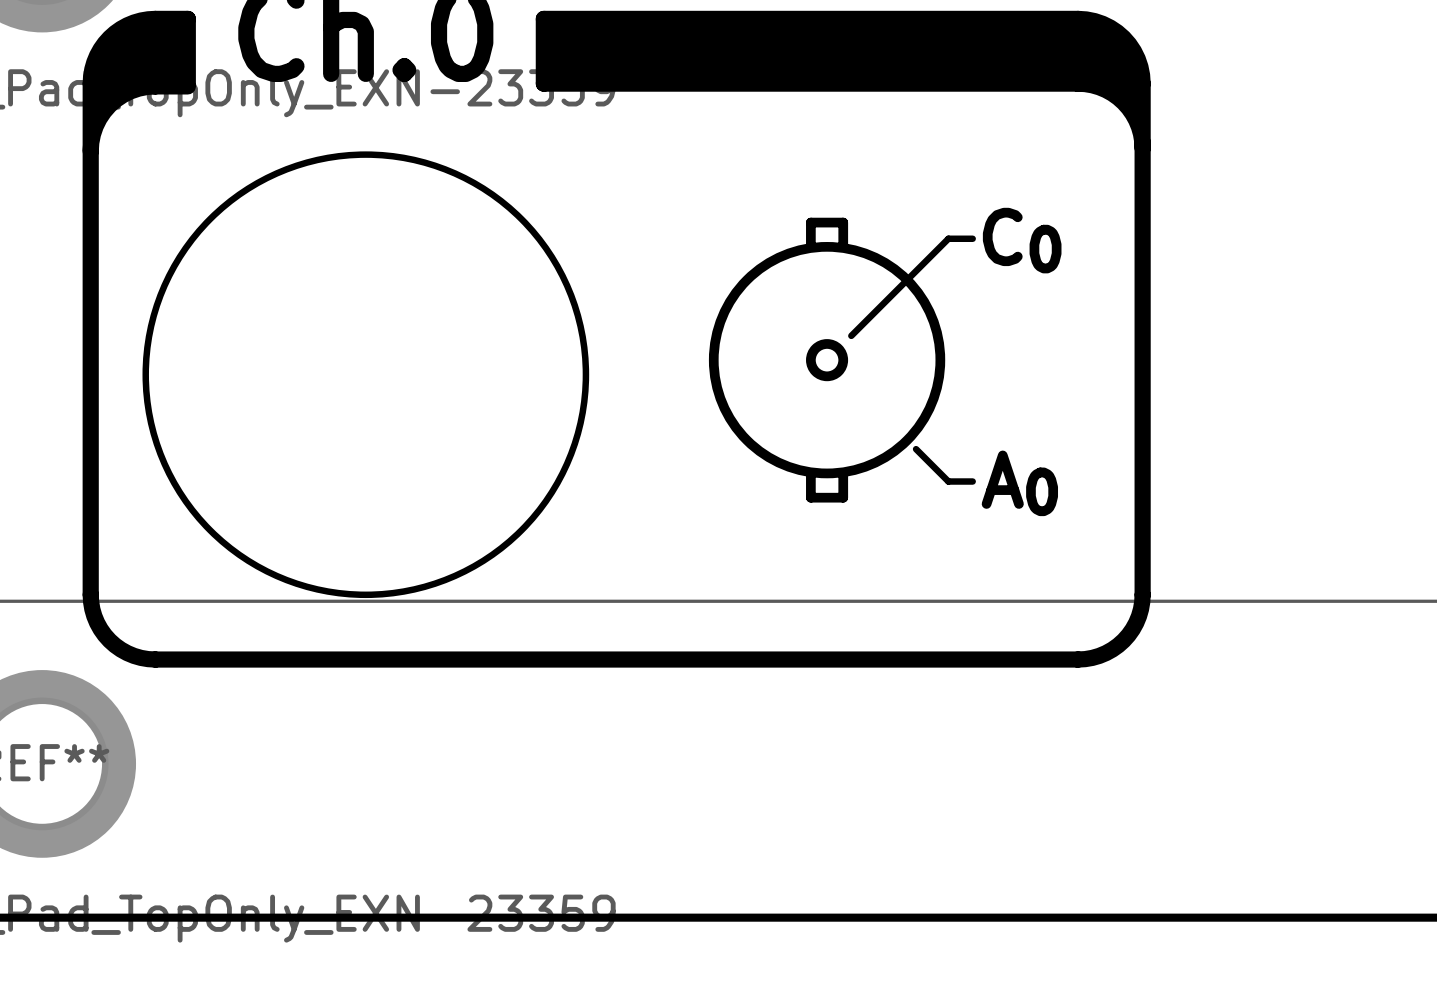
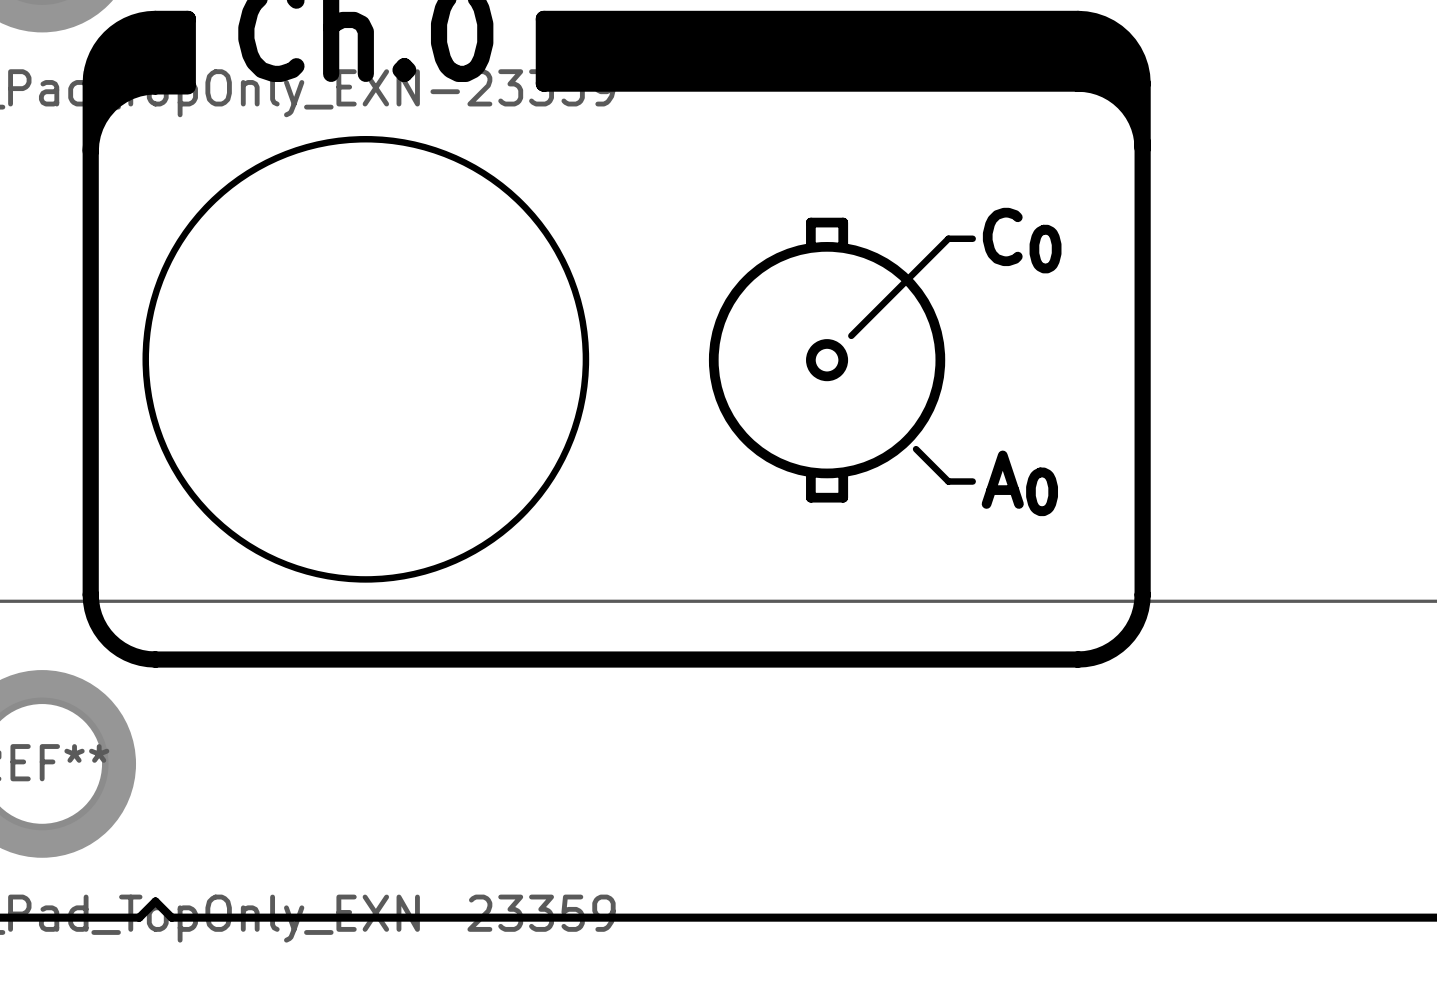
round board edge position: (365, 374) -> (365, 359)
board edge: (139, 917) (171, 917) -> (139, 917) (155, 901) (171, 917)

